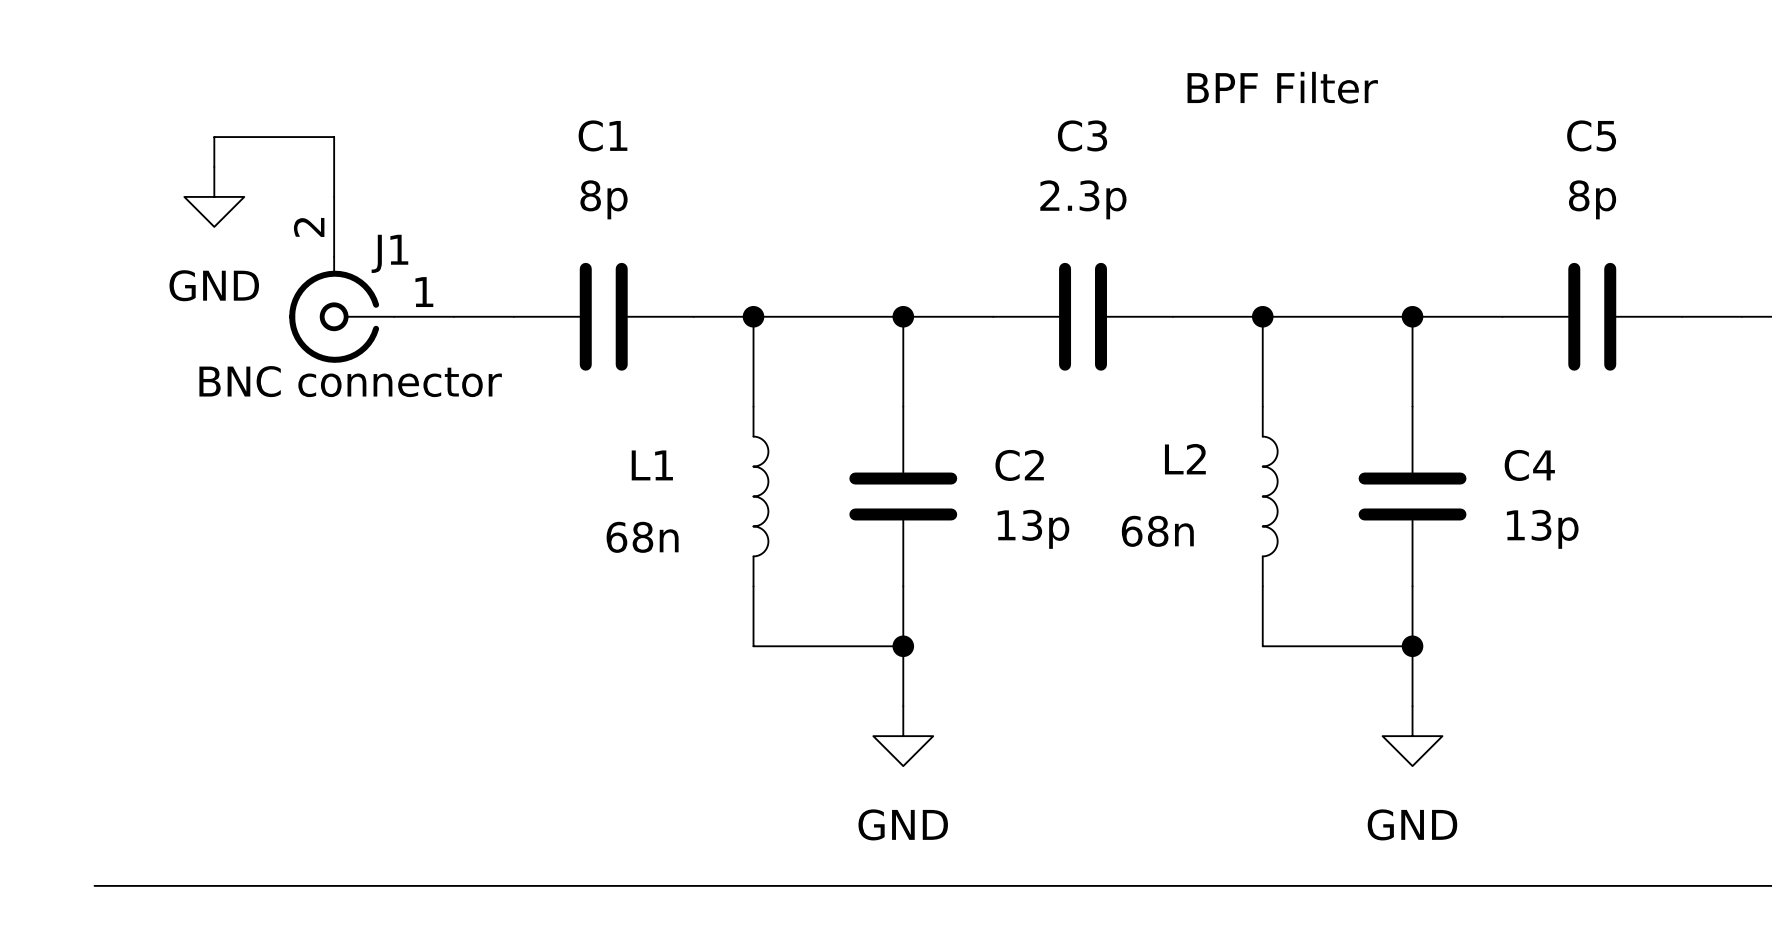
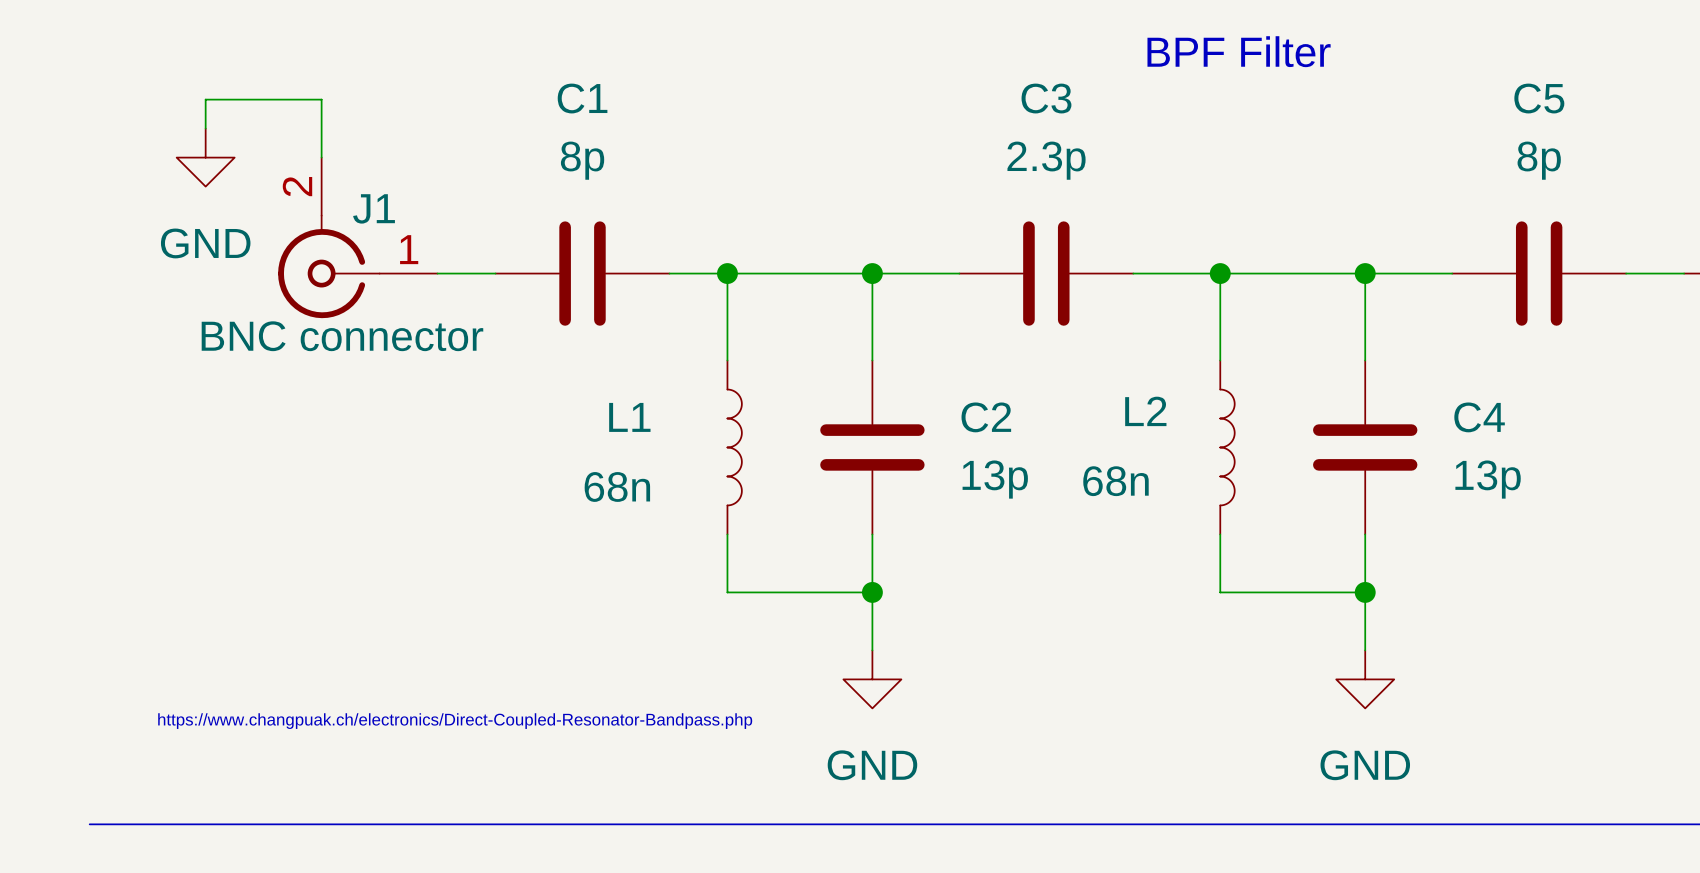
text: none -> https://www.changpuak.ch/electronics/Direct-Coupled-Resonator-Bandpass.php (455, 721)

